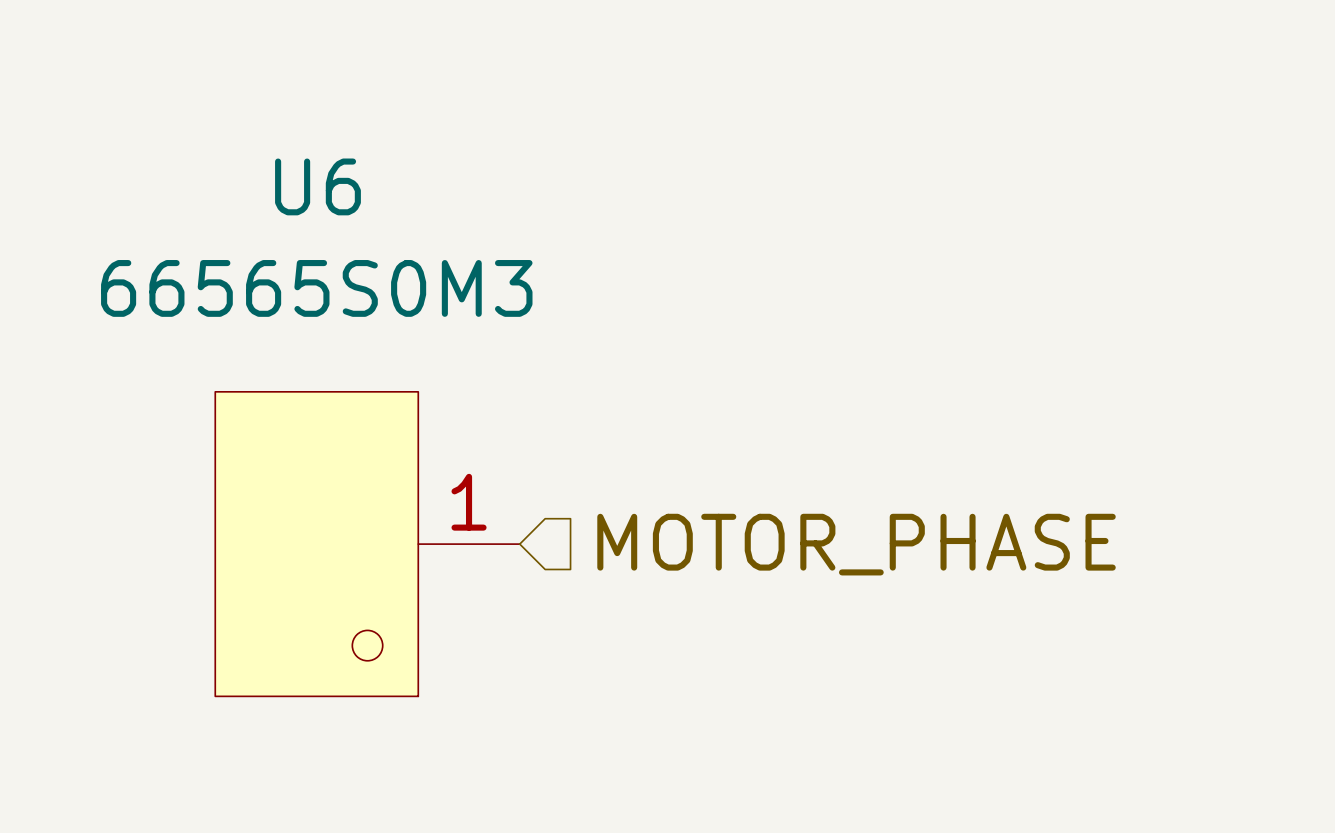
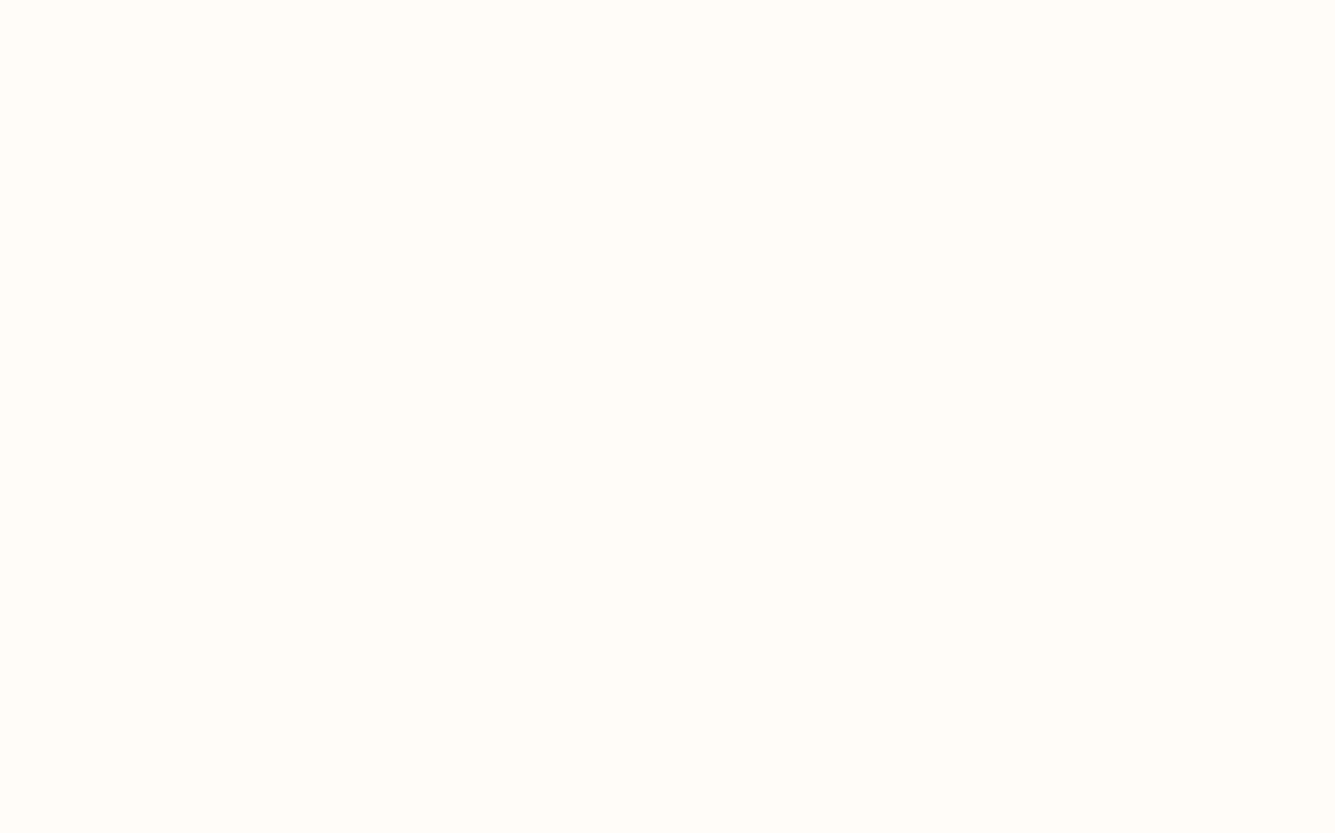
U6: 66565S0M3 (367, 544) -> none
hierarchical label: MOTOR_PHASE (856, 544) -> none

